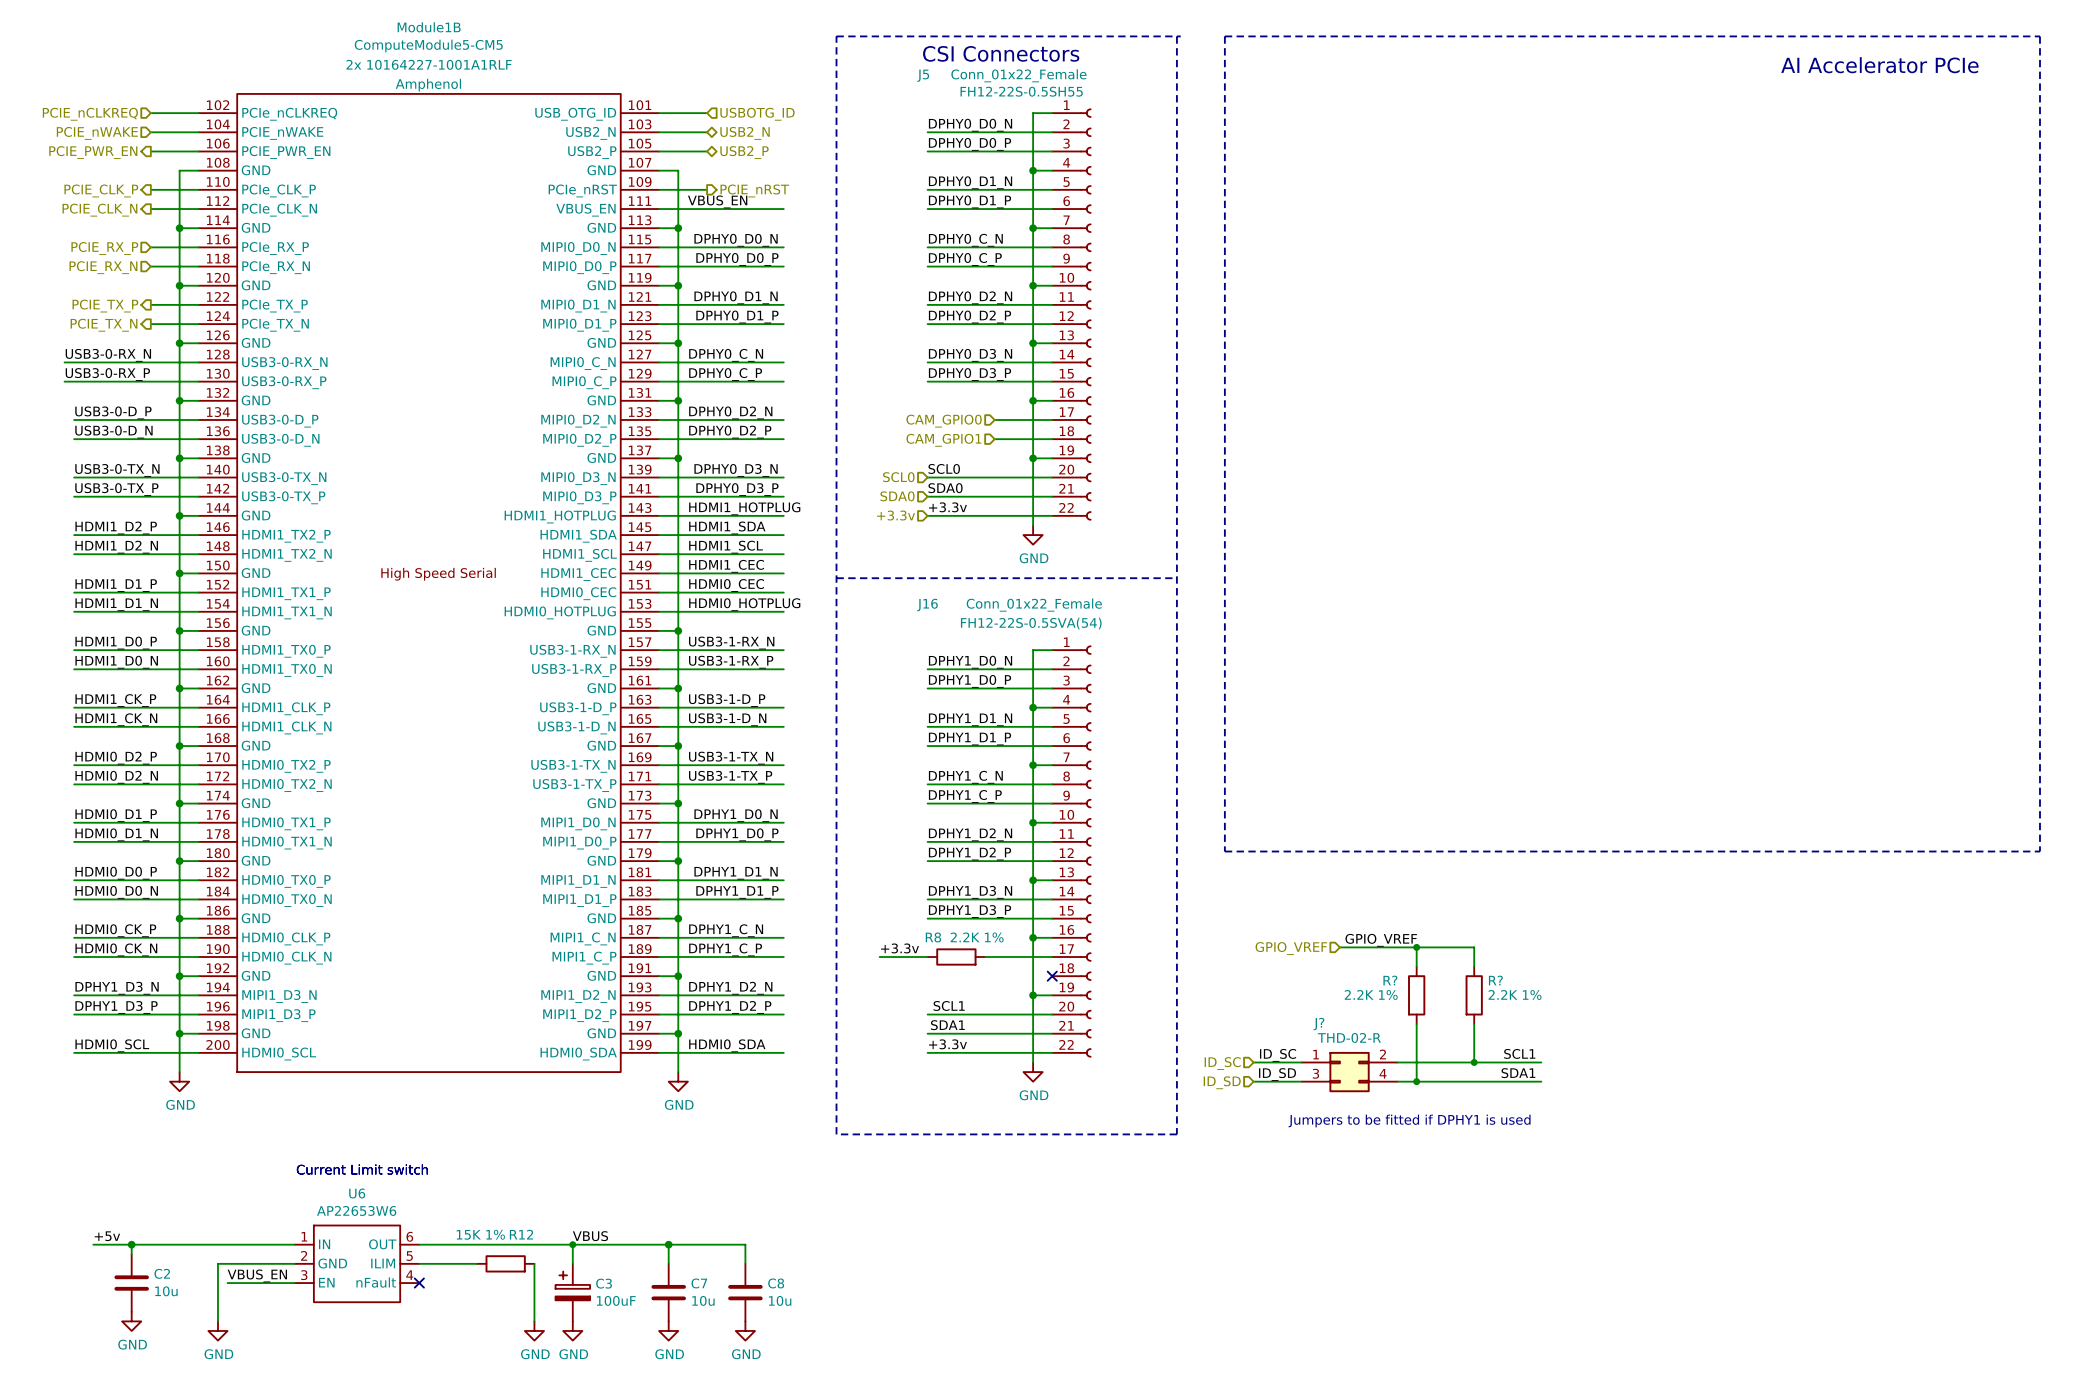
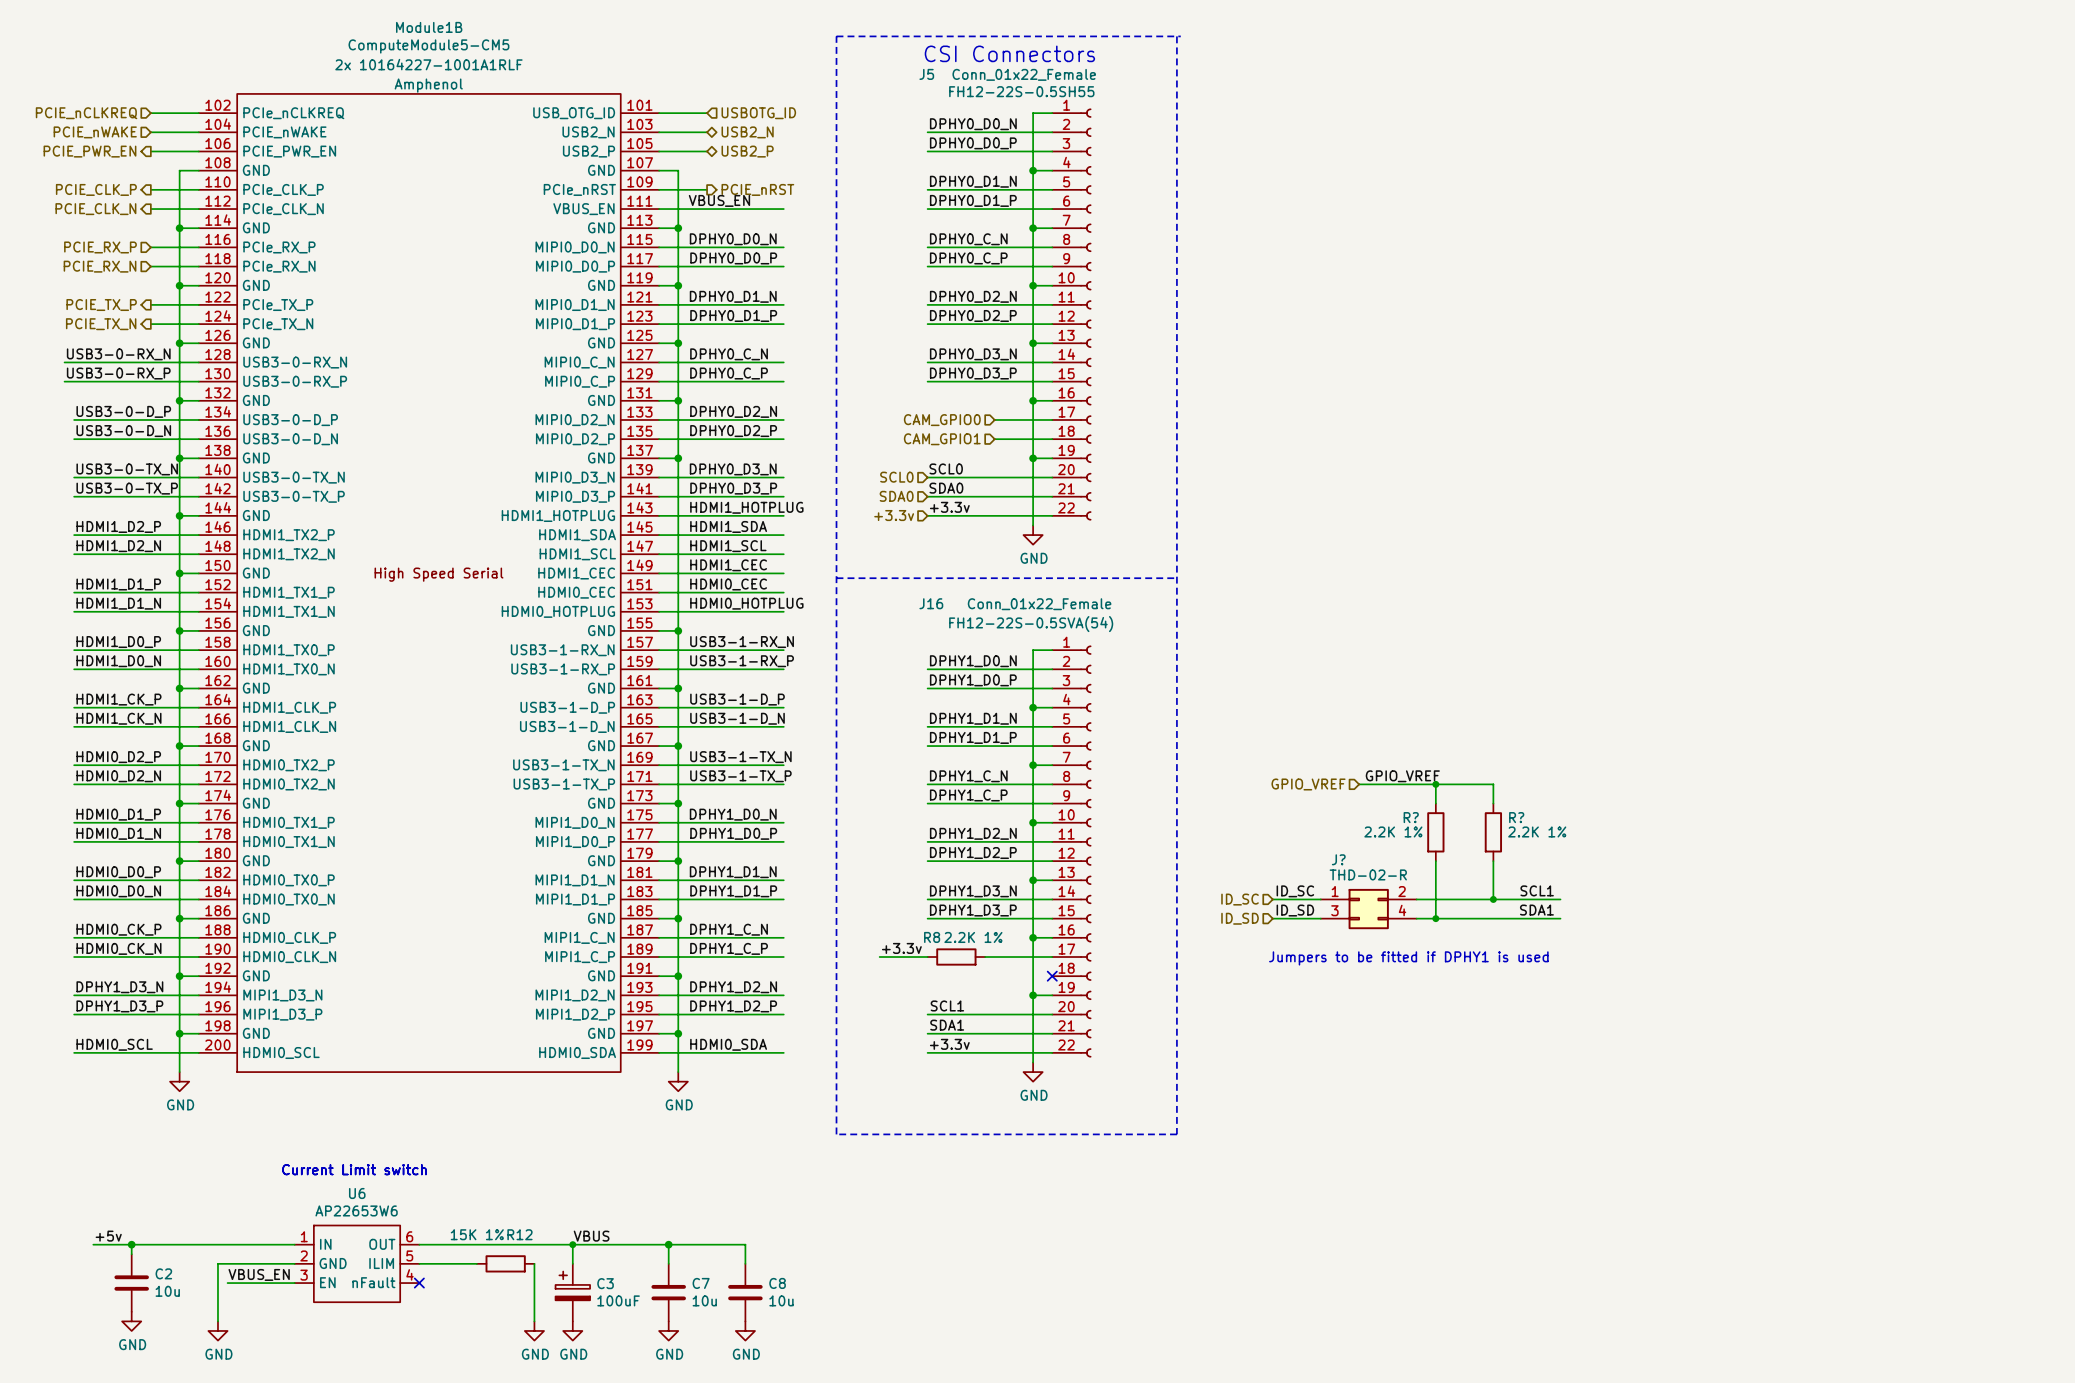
line: (1224, 36) (2039, 36) (2039, 851) (1224, 851) (1224, 36) -> none
text: AI Accelerator PCIe (1879, 65) -> none
junction: none -> (1435, 784)
R?: none -> 2.2K 1% (1435, 832)
R?: none -> 2.2K 1% (1493, 832)
junction: none -> (1493, 899)
label position: GPIO_VREF (1381, 940) -> GPIO_VREF (1402, 776)
wire: (1339, 947) (1474, 947) (1474, 966) -> (1359, 784) (1493, 784) (1493, 803)
wire: (1416, 947) (1416, 966) -> (1435, 784) (1435, 803)
junction position: (1416, 947) -> (1435, 918)
hierarchical label position: GPIO_VREF (1291, 948) -> GPIO_VREF (1308, 784)
R?: 2.2K 1% (1416, 995) -> none
R?: 2.2K 1% (1474, 995) -> none
wire: (1416, 1024) (1416, 1081) -> (1435, 861) (1435, 918)
wire: (1474, 1024) (1474, 1062) -> (1493, 861) (1493, 899)
label position: SCL1 (1519, 1053) -> SCL1 (1537, 890)
label position: ID_SC (1278, 1055) -> ID_SC (1295, 891)
wire: (1253, 1062) (1301, 1062) -> (1272, 899) (1320, 899)
wire: (1397, 1062) (1541, 1062) -> (1416, 899) (1560, 899)
junction: (1474, 1062) -> none
hierarchical label position: ID_SC (1222, 1063) -> ID_SC (1240, 899)
J? position: (1349, 1072) -> (1368, 909)
label position: SDA1 (1518, 1073) -> SDA1 (1536, 910)
label position: ID_SD (1277, 1074) -> ID_SD (1295, 910)
wire: (1253, 1081) (1301, 1081) -> (1272, 918) (1320, 918)
wire: (1397, 1081) (1541, 1081) -> (1416, 918) (1560, 918)
junction: (1416, 1081) -> none
hierarchical label position: ID_SD (1222, 1082) -> ID_SD (1240, 918)
text position: Jumpers to be fitted if DPHY1 is used (1409, 1121) -> Jumpers to be fitted if DPHY1 is used (1408, 958)

